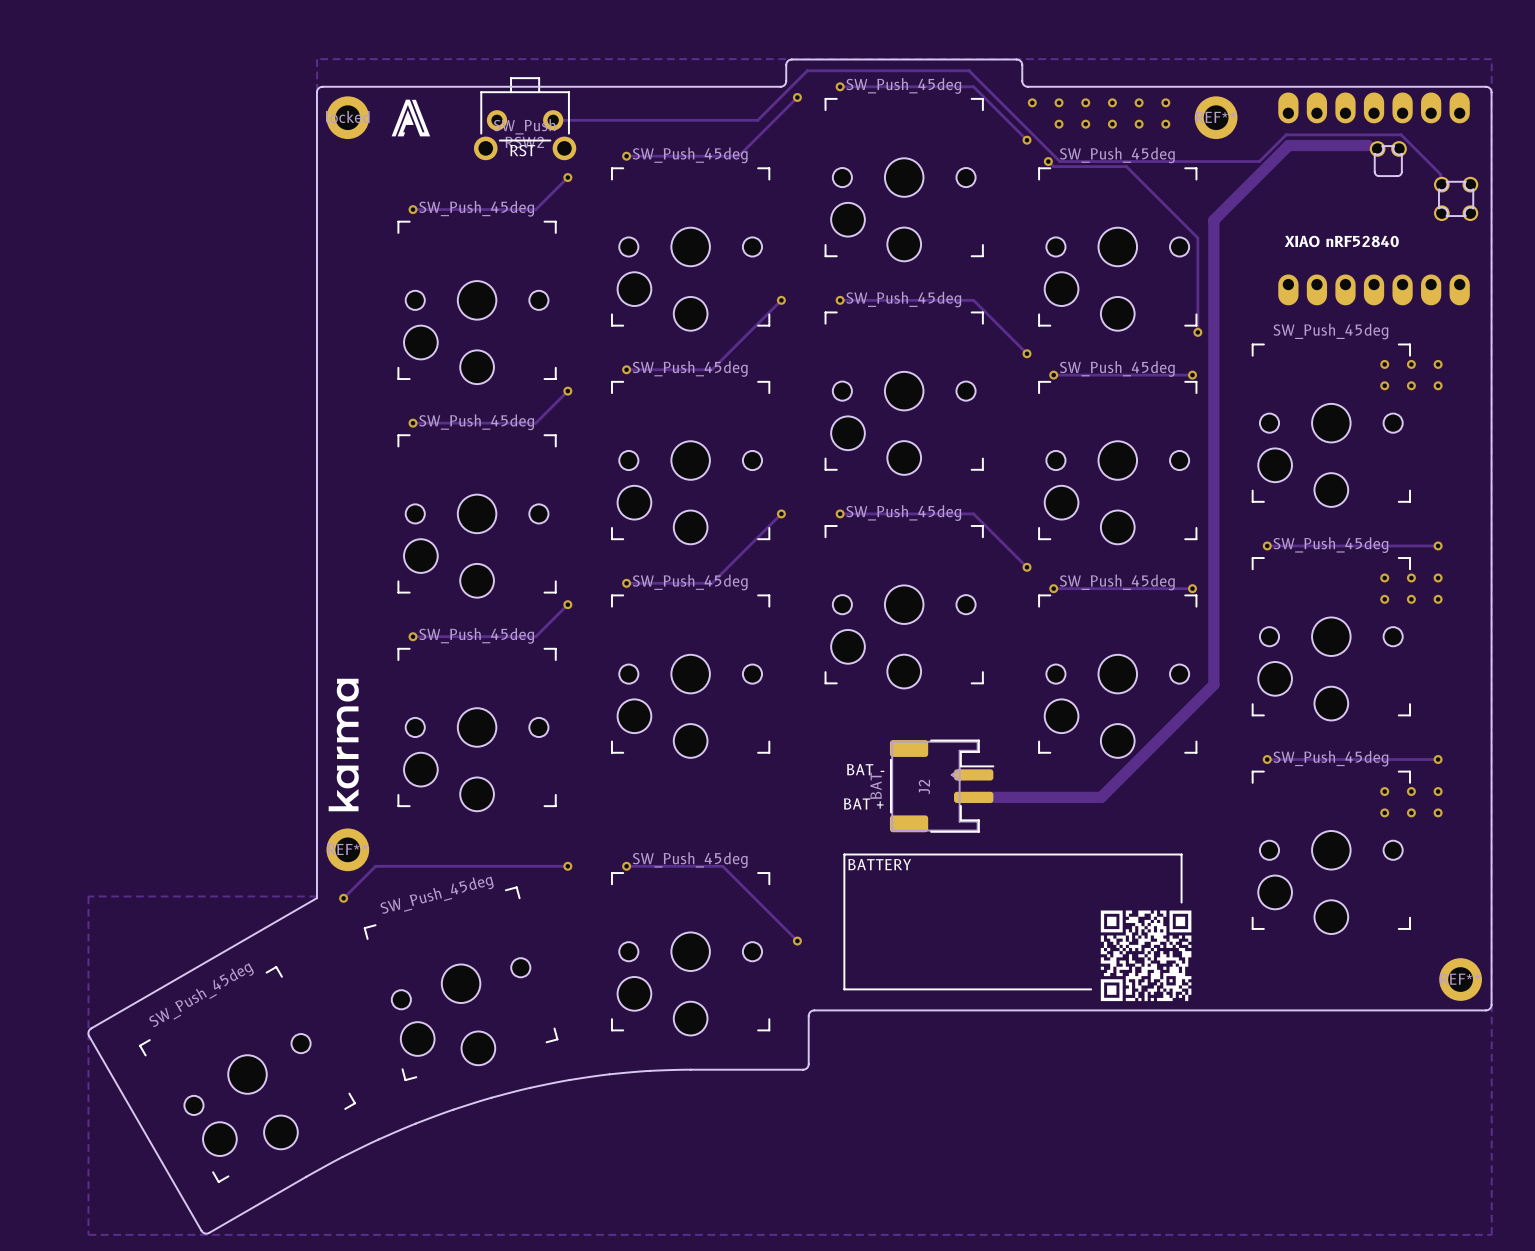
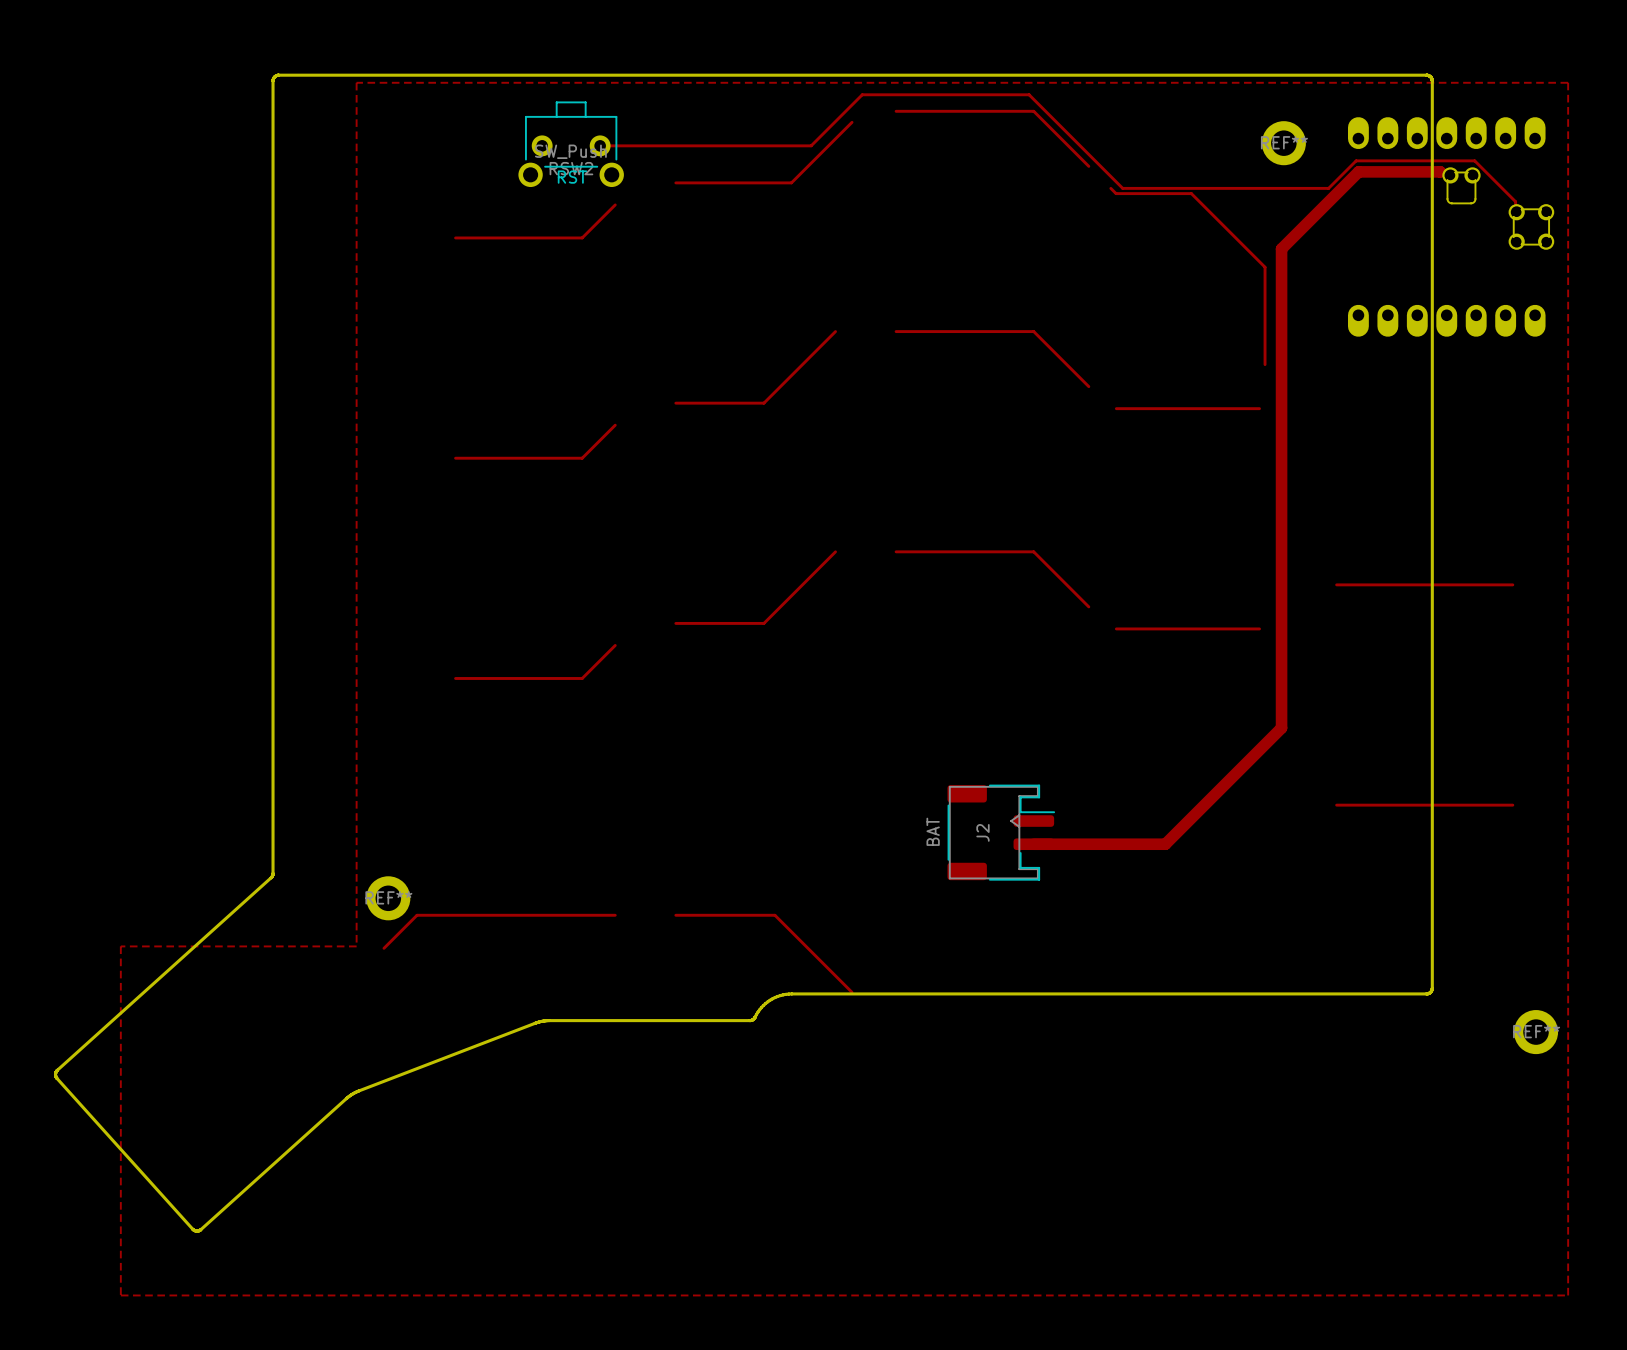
board edge: (791, 59) (1017, 59) (1022, 63) (1022, 83) (1027, 86) (1485, 86) (1490, 88) (1490, 1007) (1485, 1010) (813, 1010) (808, 1015) (808, 1064) (805, 1069) (680, 1069) (627, 1072) (561, 1081) (491, 1097) (435, 1116) (373, 1142) (320, 1169) (209, 1232) (203, 1232) (88, 1032) (91, 1028) (316, 898) (317, 89) (322, 86) (780, 86) (785, 83) (786, 63) (791, 59) -> none
via: (840, 86) -> none
via: (797, 97) -> none
drawing: [391, 99, 431, 137] -> none
via: (1032, 102) -> none
via: (1059, 102) -> none
via: (1085, 102) -> none
via: (1112, 102) -> none
via: (1139, 102) -> none
via: (1165, 102) -> none
part: (347, 117) -> none
via: (1059, 124) -> none
via: (1085, 124) -> none
via: (1112, 124) -> none
via: (1139, 124) -> none
via: (1165, 124) -> none
via: (1027, 140) -> none
via: (626, 156) -> none
via: (1048, 161) -> none
via: (567, 177) -> none
part: SW_Push_45deg (904, 179) -> none
via: (413, 209) -> none
text: XIAO nRF52840 (1341, 241) -> none
part: SW_Push_45deg (690, 249) -> none
part: SW_Push_45deg (1117, 249) -> none
via: (781, 300) -> none
via: (840, 300) -> none
part: SW_Push_45deg (477, 302) -> none
via: (1197, 332) -> none
via: (1027, 353) -> none
via: (1384, 364) -> none
via: (1411, 364) -> none
via: (1438, 364) -> none
via: (626, 369) -> none
via: (1053, 375) -> none
via: (1192, 375) -> none
via: (1384, 385) -> none
via: (1411, 385) -> none
via: (1438, 385) -> none
via: (567, 391) -> none
part: SW_Push_45deg (904, 393) -> none
via: (413, 423) -> none
part: SW_Push_45deg (1331, 425) -> none
part: SW_Push_45deg (690, 462) -> none
part: SW_Push_45deg (1117, 462) -> none
via: (781, 513) -> none
via: (840, 513) -> none
part: SW_Push_45deg (477, 516) -> none
via: (1267, 545) -> none
via: (1438, 545) -> none
via: (1027, 567) -> none
via: (1384, 577) -> none
via: (1411, 577) -> none
via: (1438, 577) -> none
via: (626, 583) -> none
via: (1053, 588) -> none
via: (1192, 588) -> none
via: (1384, 599) -> none
via: (1411, 599) -> none
via: (1438, 599) -> none
via: (567, 604) -> none
part: SW_Push_45deg (904, 606) -> none
via: (413, 636) -> none
part: SW_Push_45deg (1331, 638) -> none
part: SW_Push_45deg (690, 676) -> none
part: SW_Push_45deg (1117, 676) -> none
drawing: [328, 678, 359, 812] -> none
part: SW_Push_45deg (477, 729) -> none
via: (1267, 759) -> none
via: (1438, 759) -> none
text: BAT - (865, 769) -> none
via: (1384, 791) -> none
via: (1411, 791) -> none
via: (1438, 791) -> none
text: BAT + (863, 803) -> none
via: (1384, 812) -> none
via: (1411, 812) -> none
via: (1438, 812) -> none
part: SW_Push_45deg (1331, 852) -> none
text: BATTERY (879, 864) -> none
via: (567, 866) -> none
via: (626, 866) -> none
via: (343, 898) -> none
line: (1181, 902) (1181, 854) (844, 854) (844, 989) (1091, 989) -> none
drawing: [1100, 910, 1192, 1002] -> none
via: (797, 941) -> none
part: SW_Push_45deg (690, 953) -> none
board edge: none -> (755, 1017) (767, 1001) (777, 996) (788, 994) (1426, 993) (1431, 991) (1432, 80) (1429, 76) (278, 75) (274, 77) (272, 874) (57, 1070) (56, 1077) (192, 1229) (197, 1231) (352, 1094) (535, 1023) (548, 1020) (749, 1020)
part: SW_Push_45deg (461, 983) -> none
part: SW_Push_45deg (247, 1074) -> none

